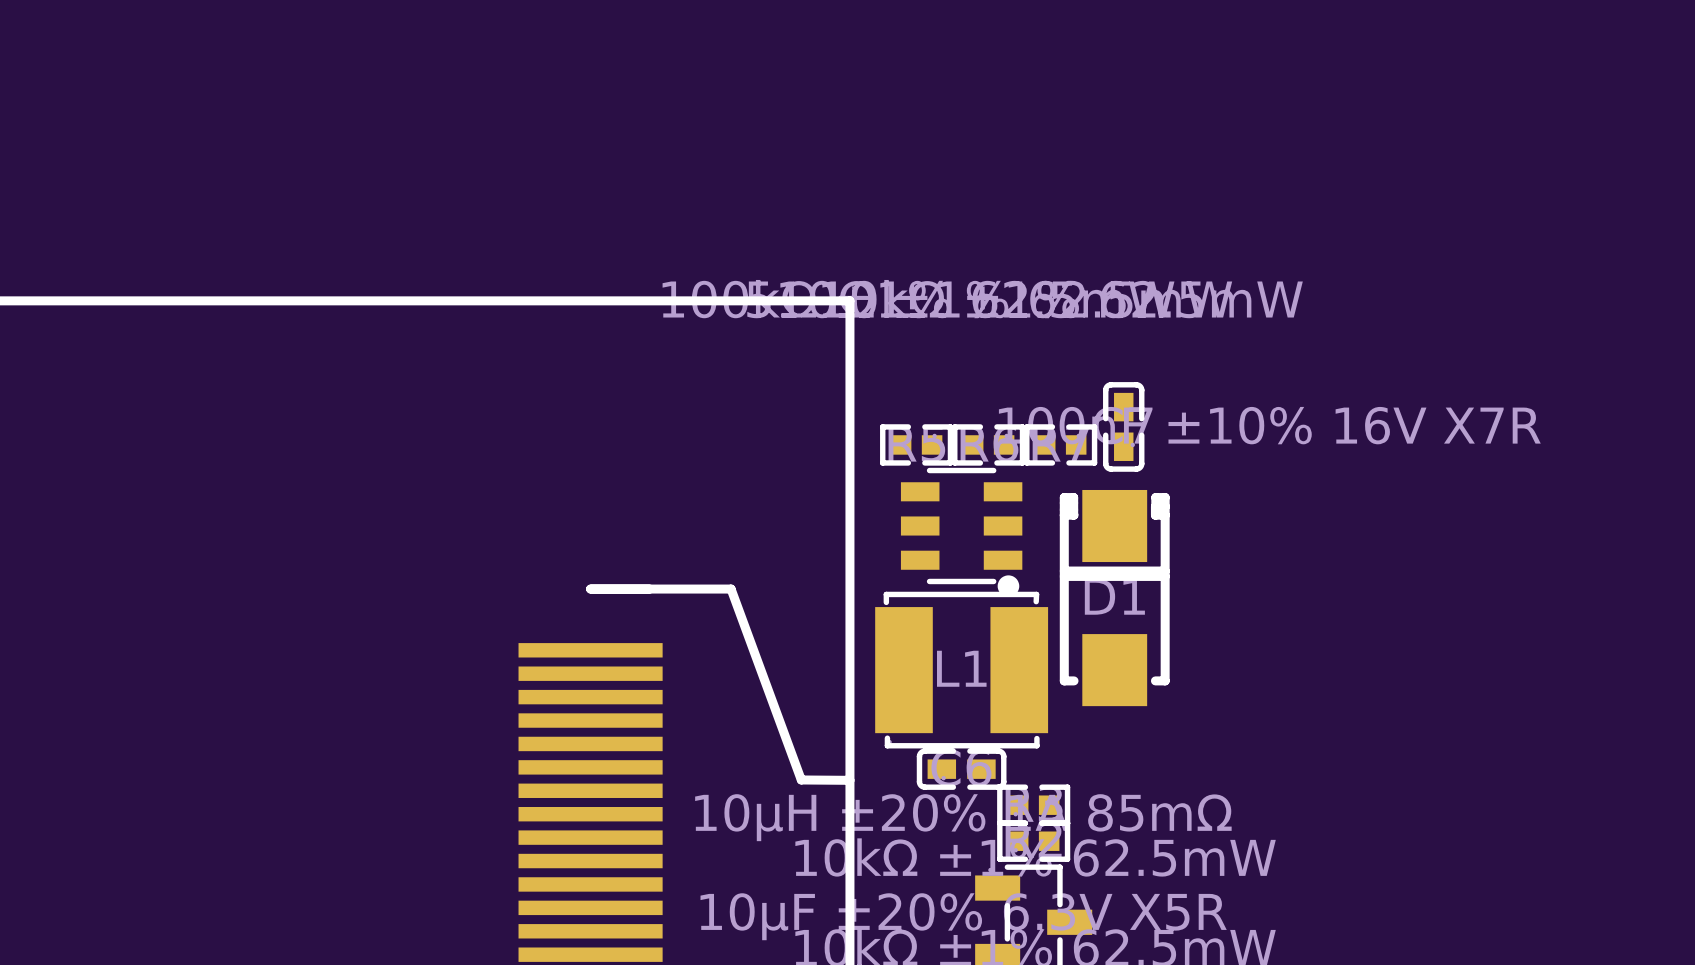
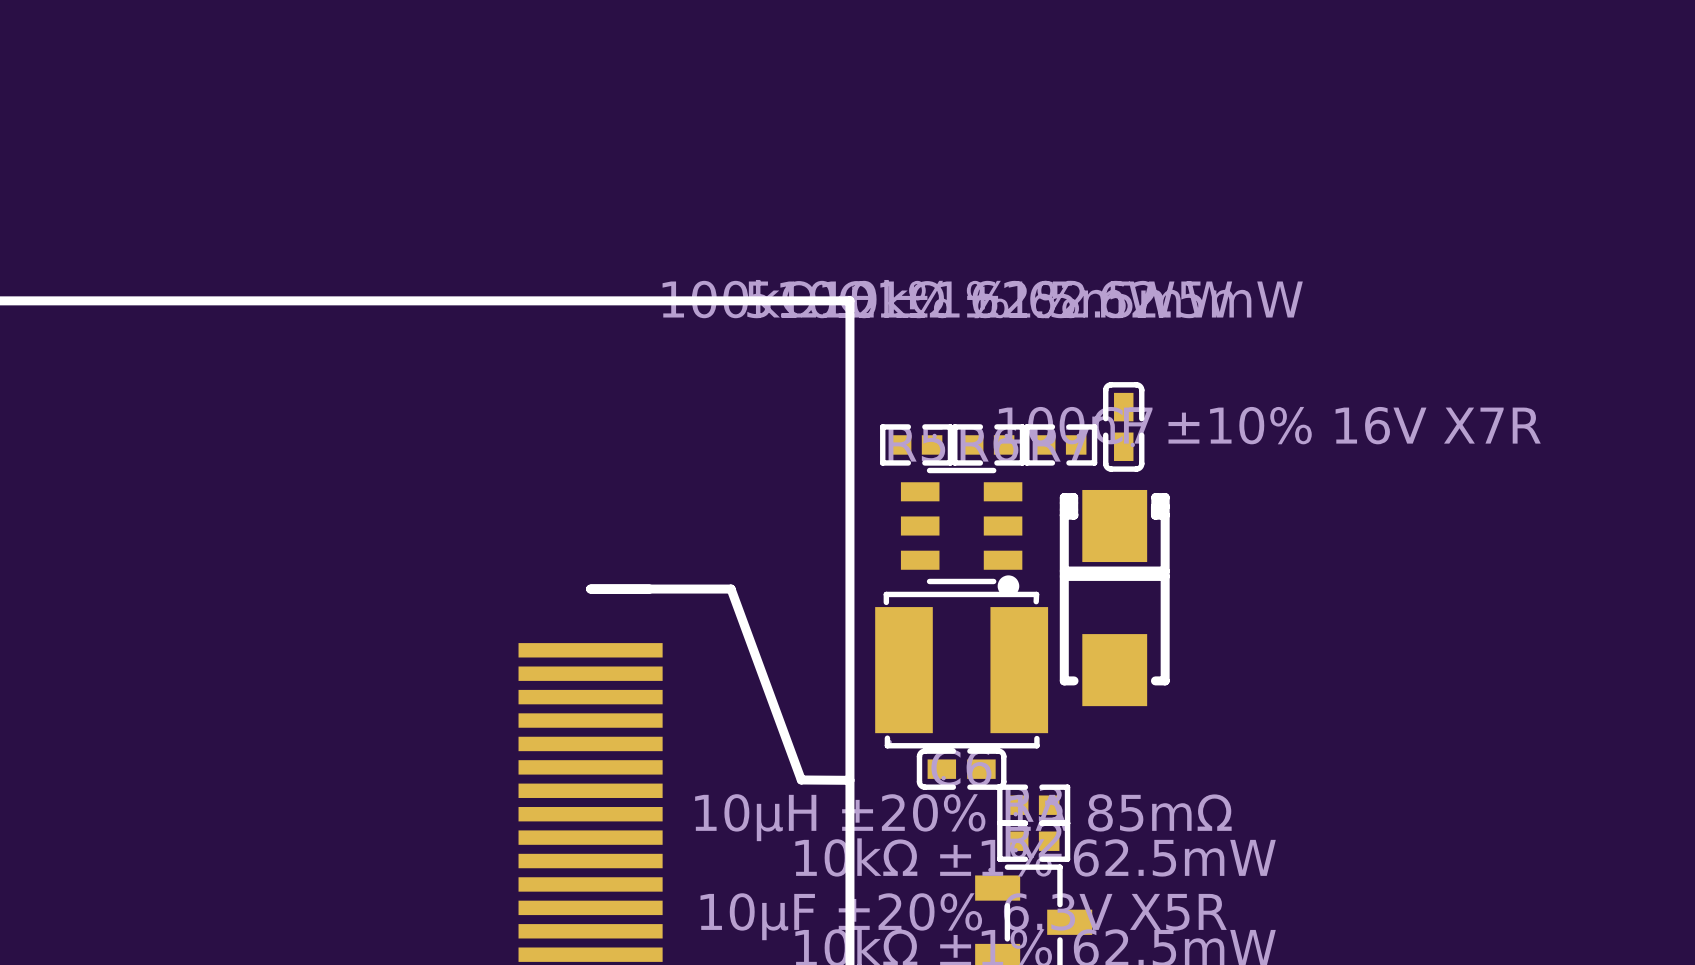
D1 name: D1 (1114, 596) -> none
L1 name: L1 (961, 668) -> none

